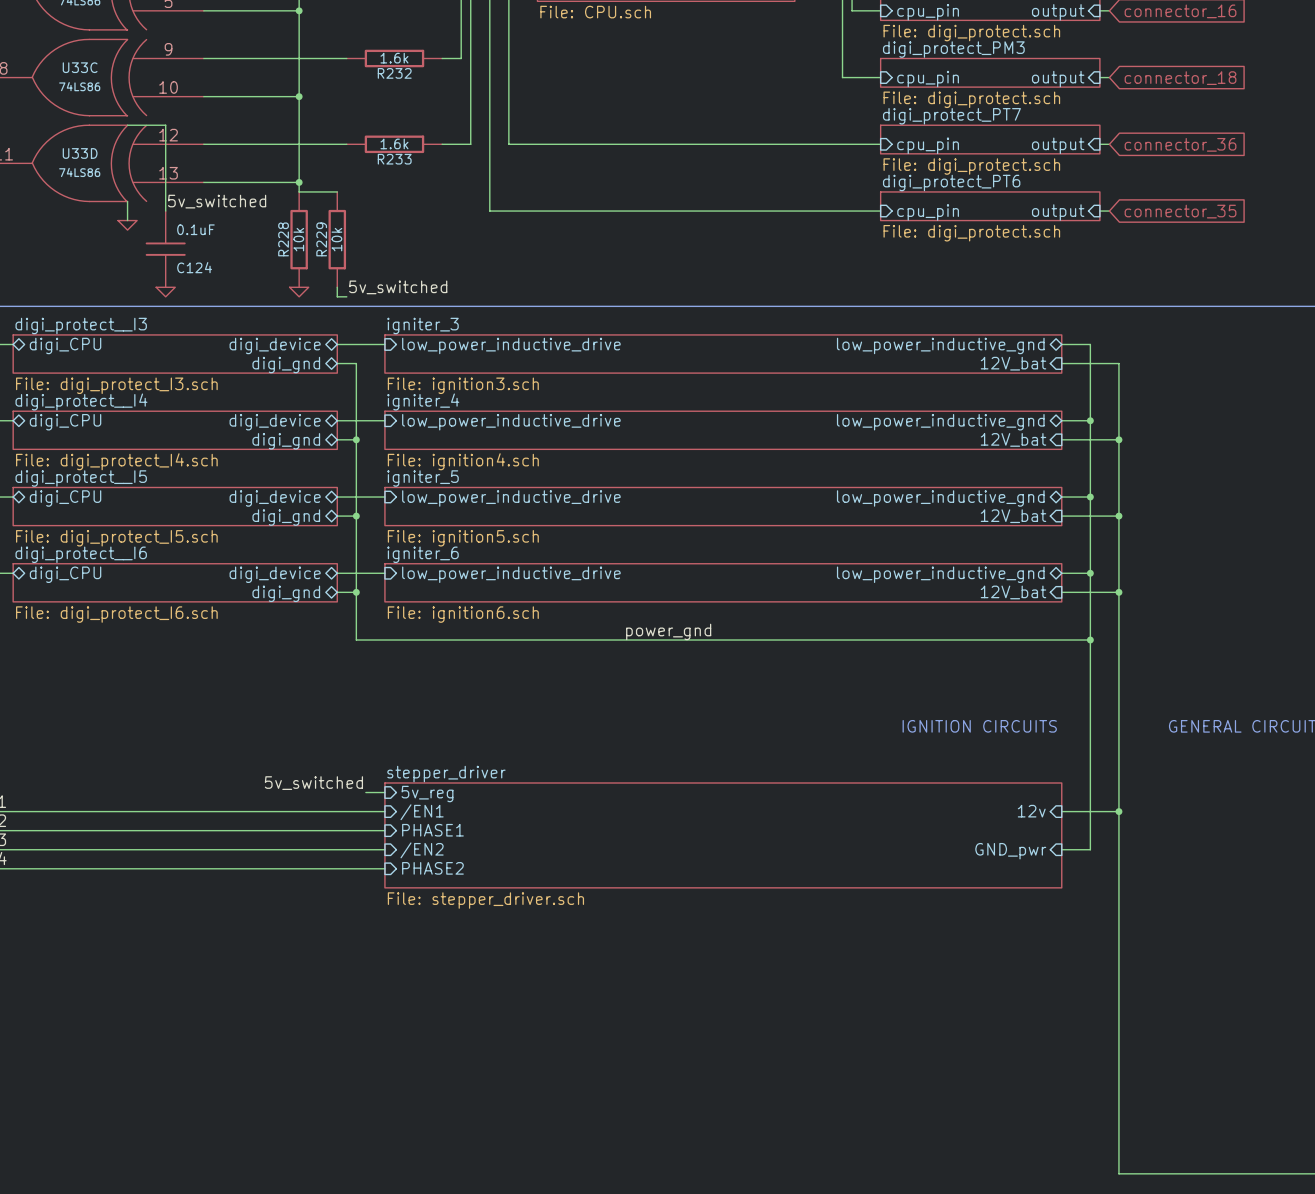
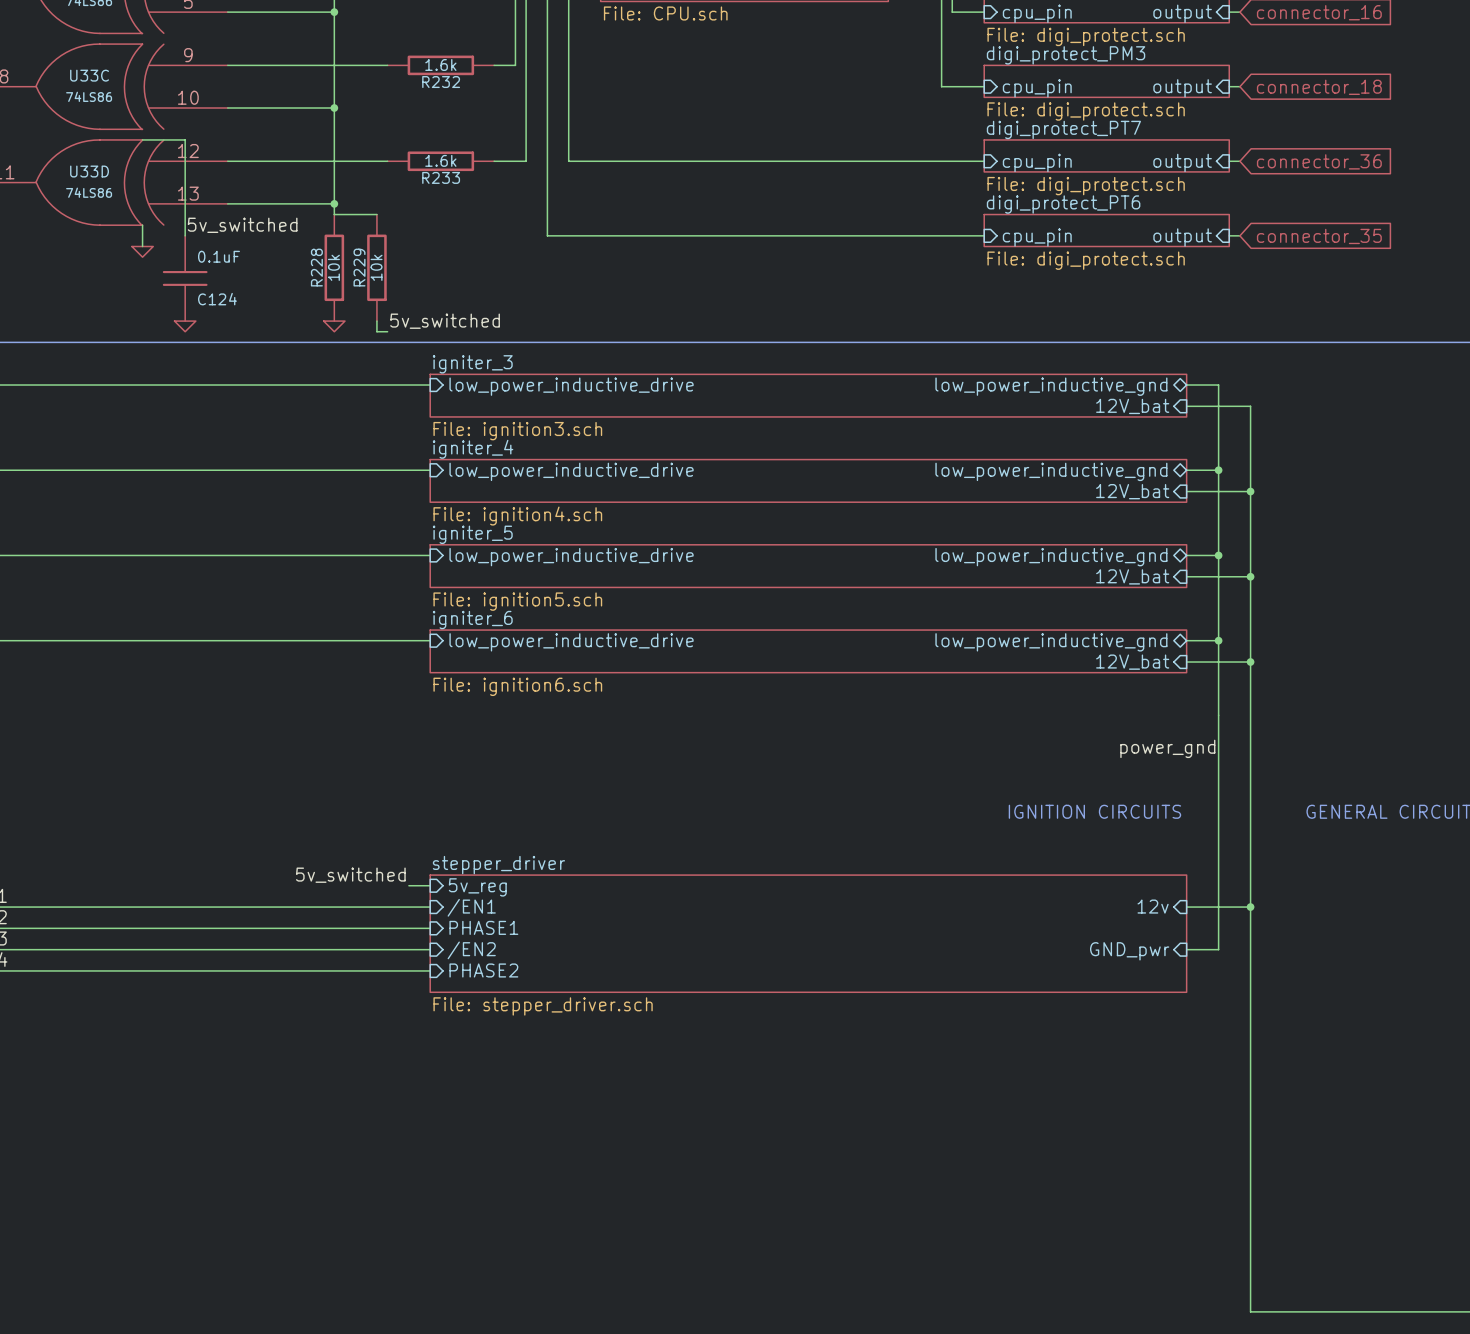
wire: none -> (14, 385) (376, 385)
sheet pin: digi_CPU (65, 345) -> none
sheet pin: digi_device (275, 345) -> none
sheet digi_protect__I3: File: digi_protect_I3.sch (175, 354) -> none
wire: (337, 363) (356, 363) (356, 640) (1090, 640) -> none
sheet pin: digi_gnd (286, 365) -> none
wire: none -> (14, 470) (376, 470)
sheet pin: digi_CPU (65, 422) -> none
sheet pin: digi_device (275, 422) -> none
sheet digi_protect__I4: File: digi_protect_I4.sch (175, 430) -> none
wire: (337, 439) (356, 439) -> none
junction: (356, 439) -> none
sheet pin: digi_gnd (286, 441) -> none
wire: none -> (14, 555) (376, 555)
sheet pin: digi_CPU (65, 498) -> none
sheet pin: digi_device (275, 498) -> none
sheet digi_protect__I5: File: digi_protect_I5.sch (175, 506) -> none
wire: (337, 516) (356, 516) -> none
junction: (356, 516) -> none
sheet pin: digi_gnd (286, 517) -> none
wire: none -> (14, 640) (376, 640)
sheet pin: digi_CPU (65, 574) -> none
sheet pin: digi_device (275, 574) -> none
sheet digi_protect__I6: File: digi_protect_I6.sch (175, 582) -> none
wire: (337, 592) (356, 592) -> none
junction: (356, 592) -> none
sheet pin: digi_gnd (286, 593) -> none
label: power_gnd (668, 631) -> none
junction: (1090, 640) -> none
label: none -> power_gnd (1167, 748)

